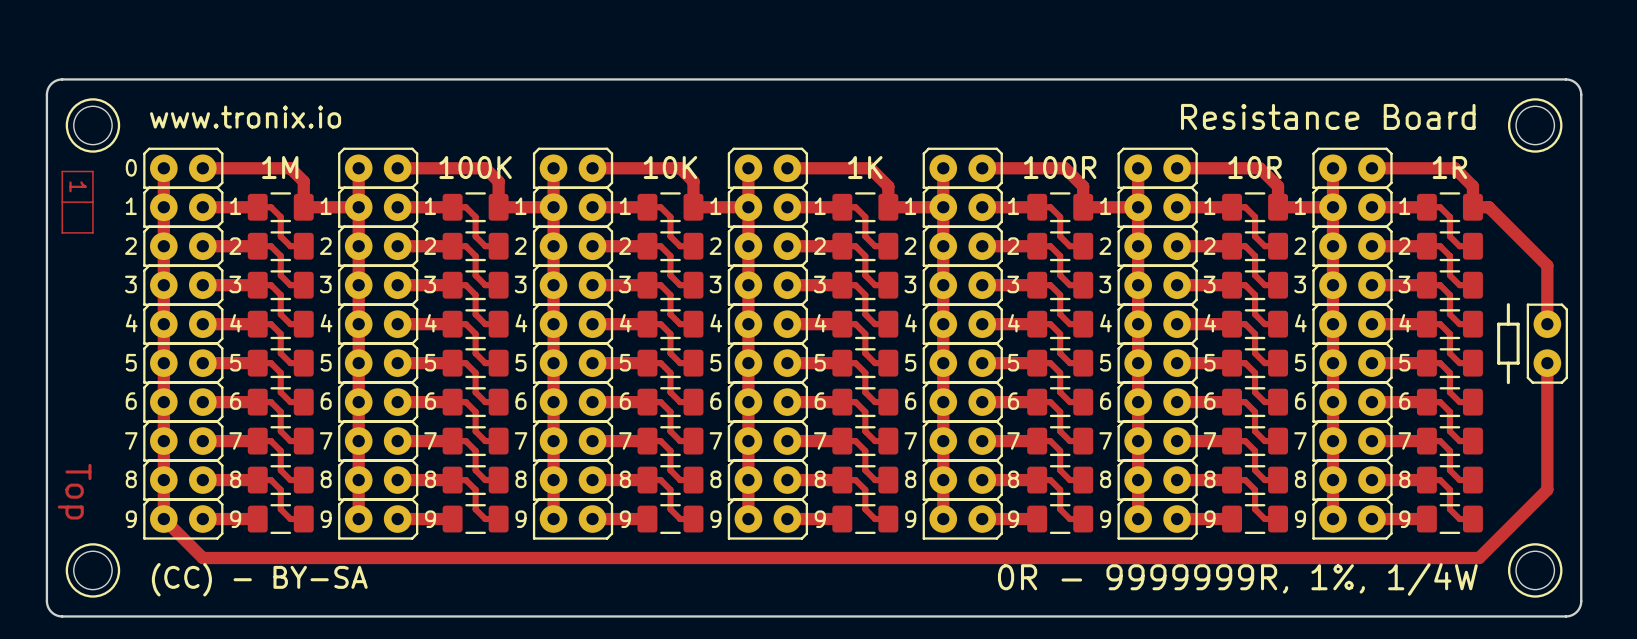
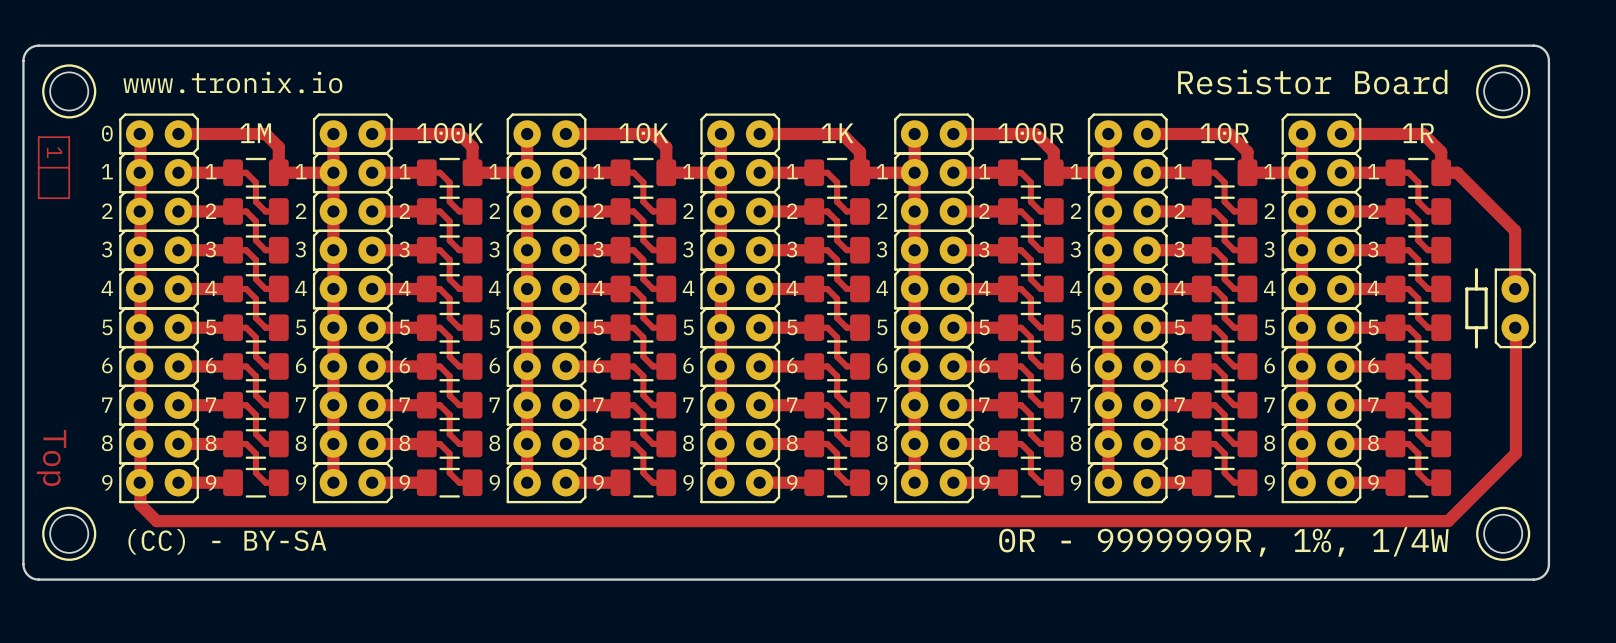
text: Resistance Board (1328, 116) -> Resistor Board (1312, 81)
track: none -> (140, 133) (140, 504) (156, 521) (1448, 521) (1515, 453) (1515, 327)
track: (163, 168) (163, 519) (202, 558) (1479, 558) (1547, 489) (1547, 363) -> none

